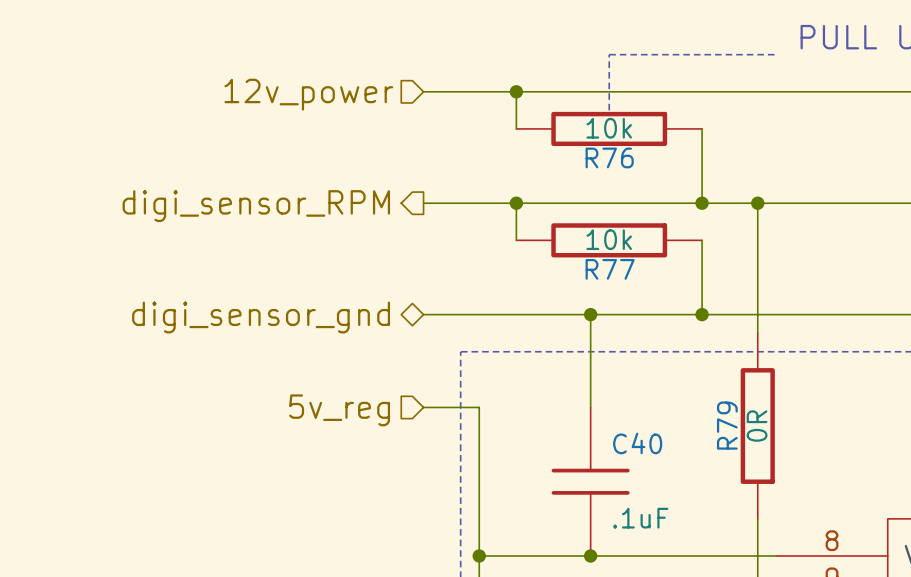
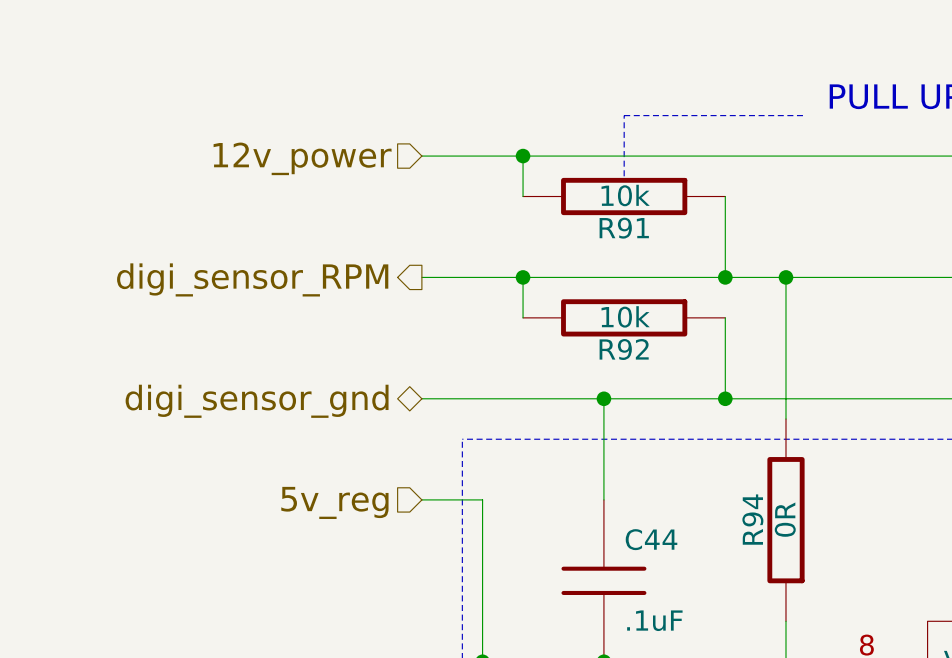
R76 name: R76 (609, 157) -> R91 (624, 228)
R77 name: R77 (610, 269) -> R92 (624, 349)
R79 name: R79 (727, 425) -> R94 (752, 519)
C40 name: C40 (637, 443) -> C44 (651, 539)

